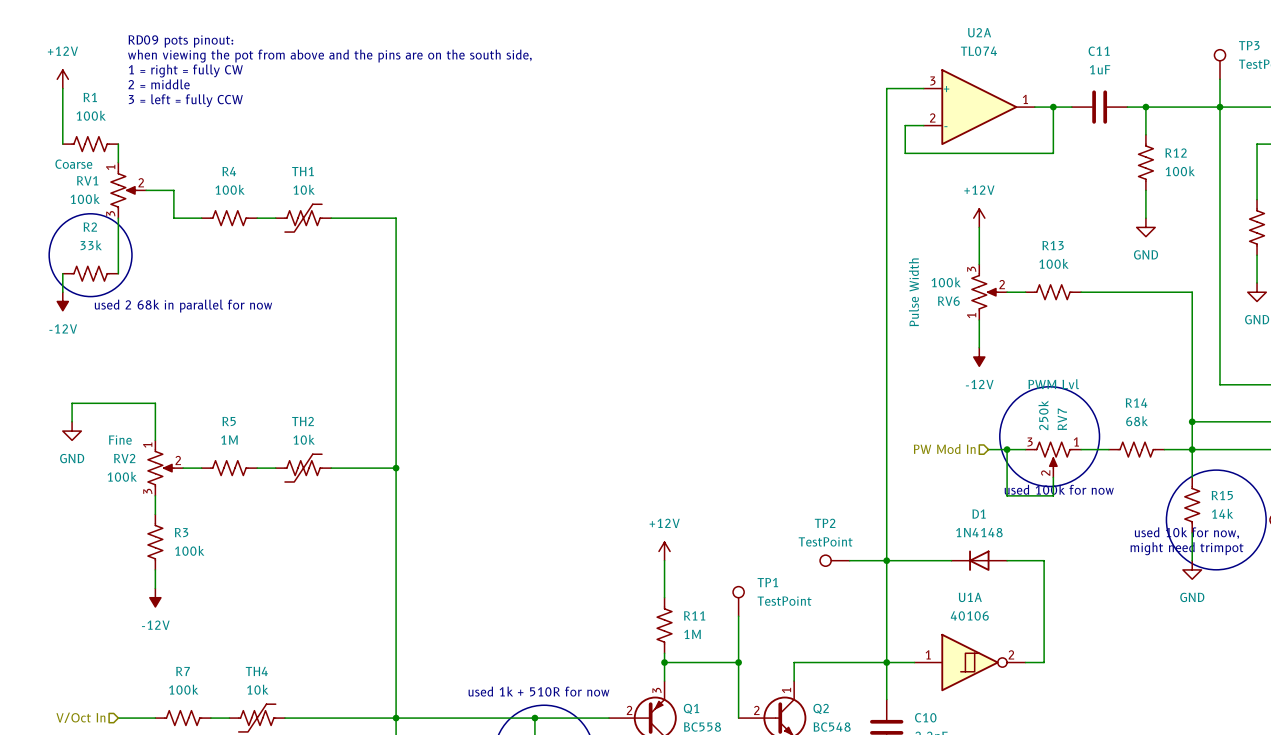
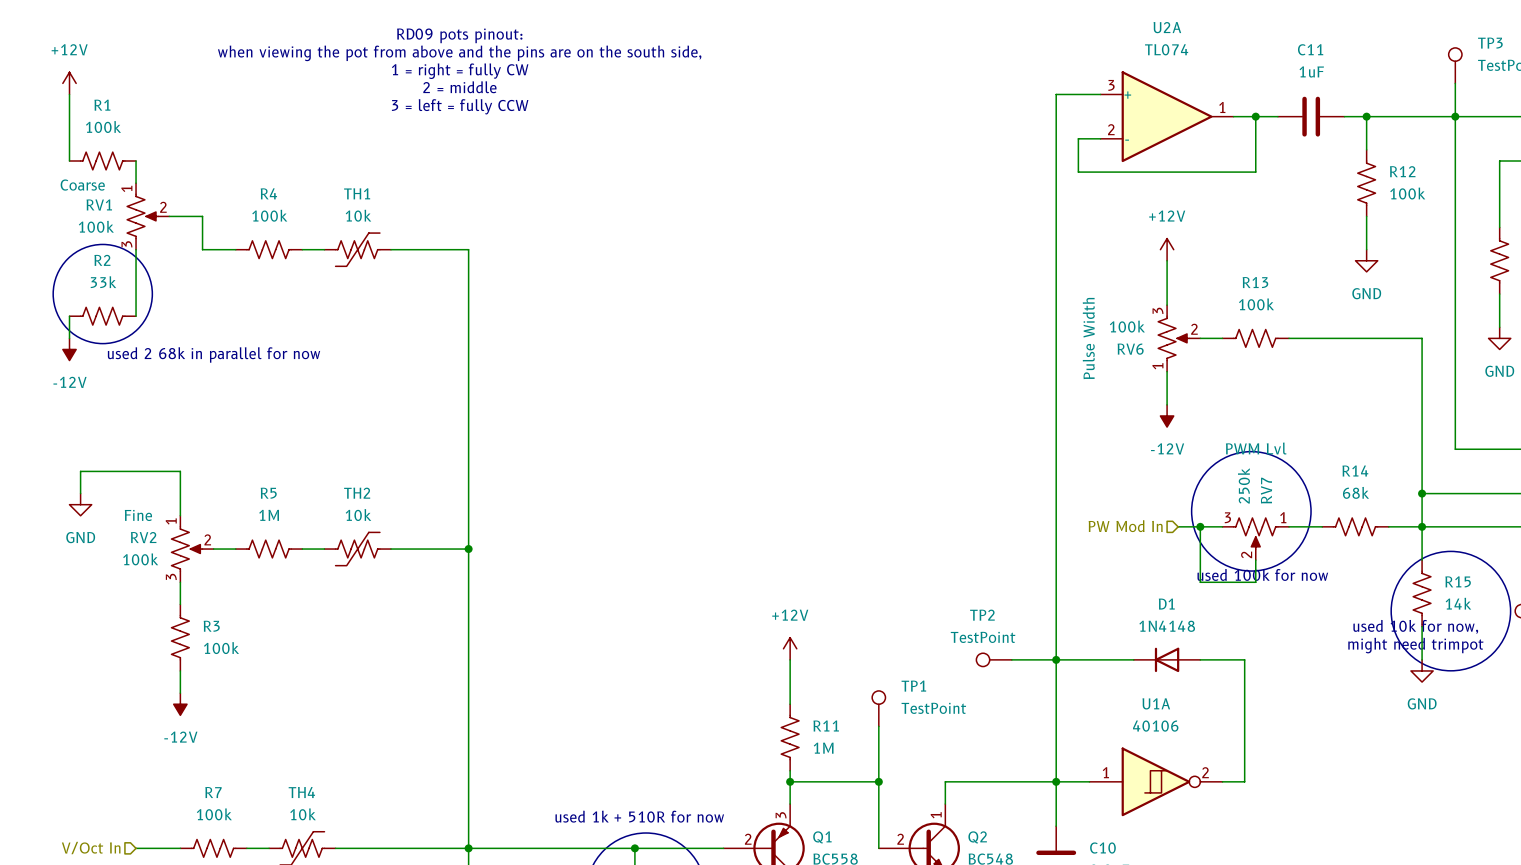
text: none -> RD09 pots pinout: (459, 35)
text: RD09 pots pinout: (180, 41) -> none
text: none -> when viewing the pot from above and the pins are on the south side, (459, 53)
text: when viewing the pot from above and the pins are on the south side, (329, 56) -> none
text: none -> 1 = right = fully CW (460, 71)
text: 1 = right = fully CW (185, 70) -> none
text: none -> 2 = middle (459, 87)
text: 2 = middle (159, 84) -> none
text: none -> 3 = left = fully CCW (460, 106)
text: 3 = left = fully CCW (185, 100) -> none

